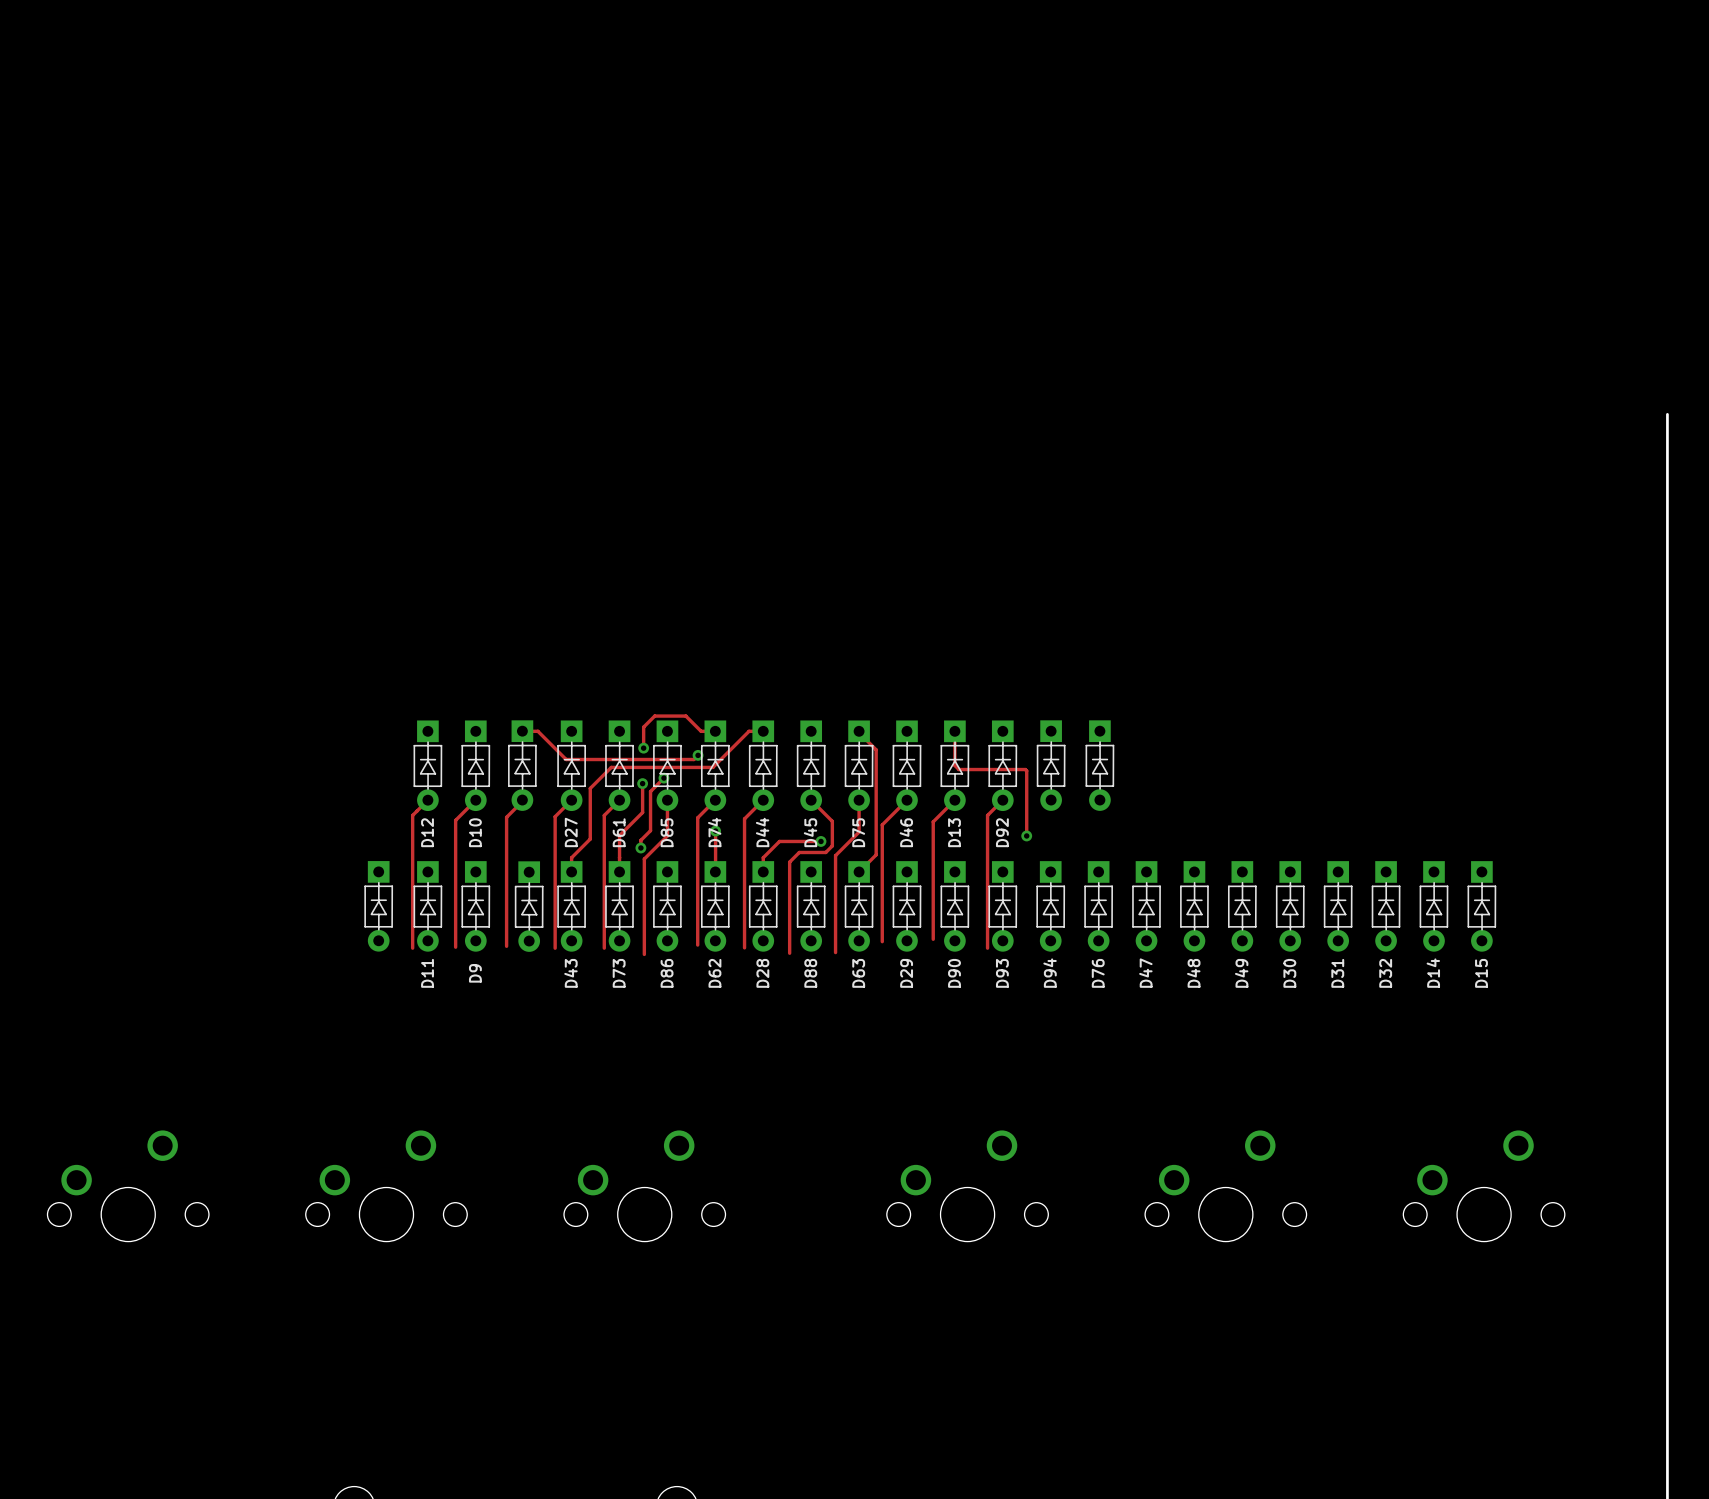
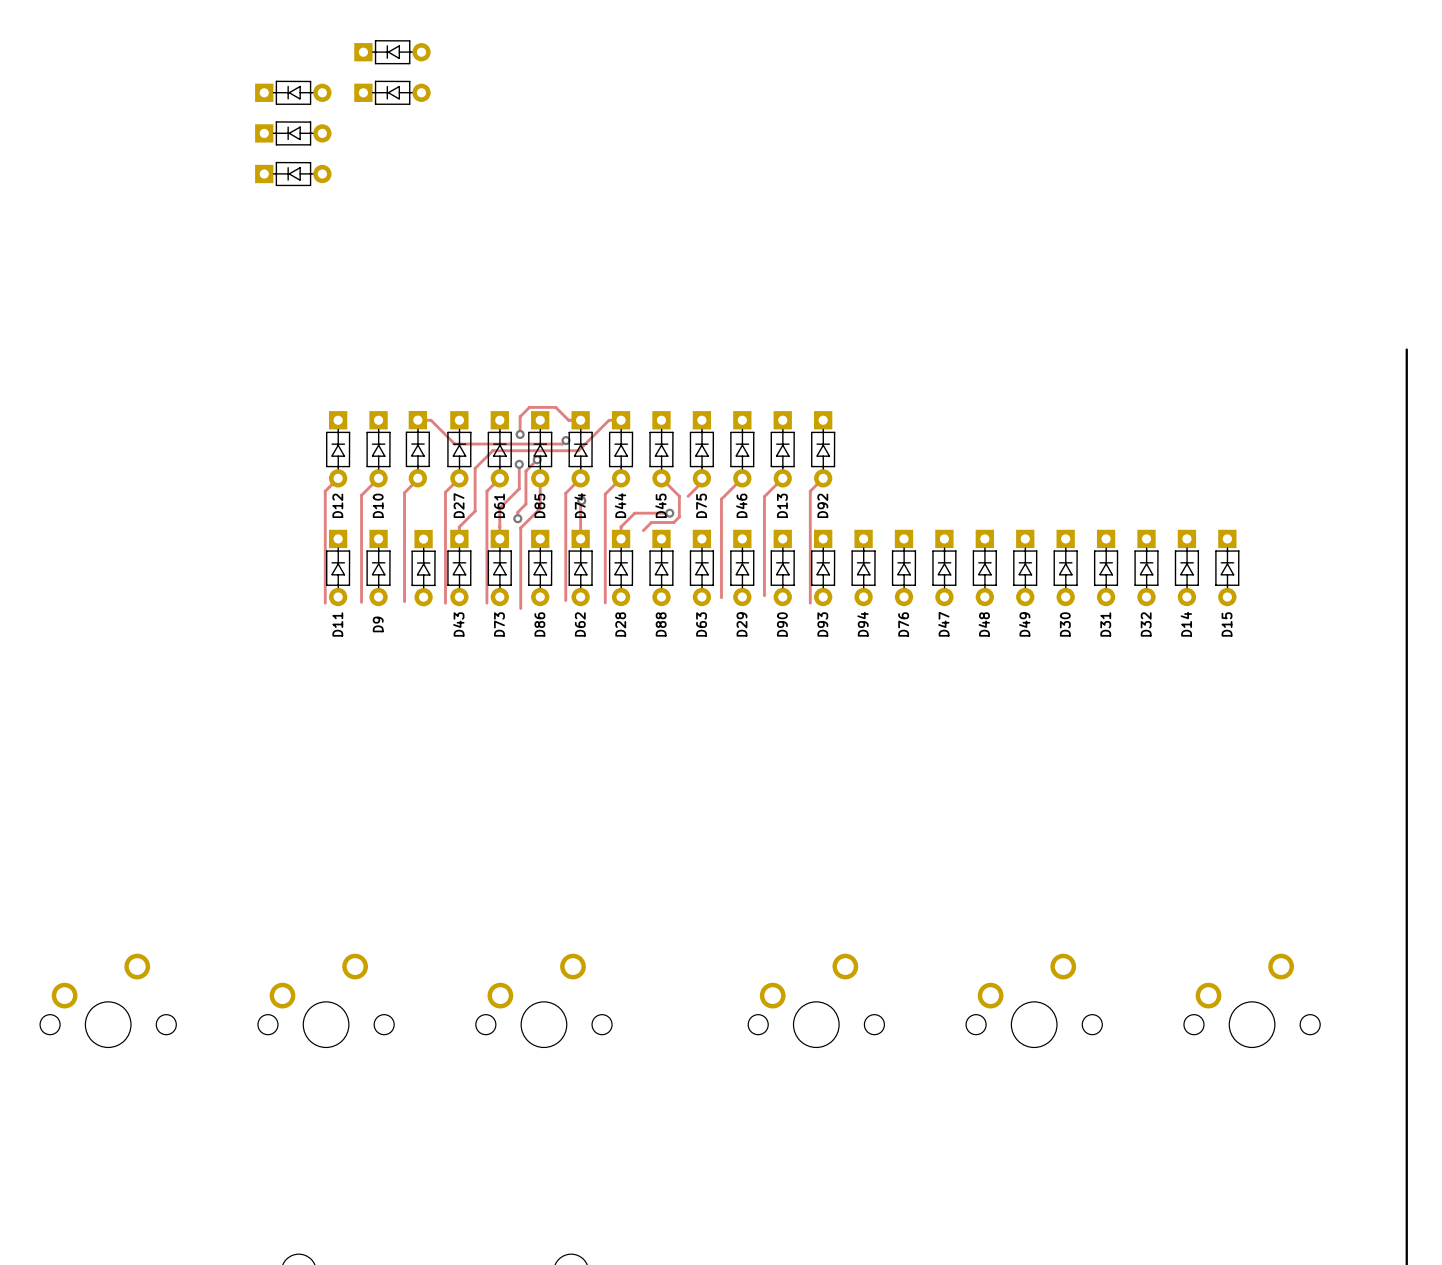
part: none -> (392, 52)
part: none -> (293, 92)
part: none -> (392, 92)
part: none -> (293, 133)
part: none -> (293, 174)
via: none -> (520, 434)
via: none -> (566, 440)
part: none -> (417, 449)
via: none -> (537, 459)
via: none -> (519, 464)
track: none -> (661, 478) (679, 496) (679, 516) (673, 522) (651, 522) (643, 530)
track: none -> (701, 478) (701, 482) (688, 496)
track: none -> (581, 500) (580, 538)
via: none -> (581, 500)
via: none -> (669, 513)
via: none -> (517, 518)
track: (523, 731) (537, 731) (566, 759) (693, 759) (698, 755) -> (418, 420) (430, 420) (454, 444) (562, 444) (566, 440)
track: (715, 731) (701, 731) (685, 716) (654, 716) (643, 727) (643, 748) -> (580, 420) (568, 420) (555, 407) (529, 407) (520, 416) (520, 434)
track: (763, 731) (749, 731) (712, 767) (611, 767) (590, 788) (590, 839) (571, 857) (571, 871) -> (621, 420) (609, 420) (578, 450) (492, 450) (475, 468) (475, 511) (459, 526) (459, 538)
track: (954, 731) (954, 765) (958, 769) (1026, 770) (1026, 835) -> none
track: (858, 732) (876, 749) (876, 854) (859, 871) -> none
via: (643, 748) -> none
via: (698, 755) -> none
D12 position: (427, 765) -> (338, 449)
D10 position: (475, 765) -> (378, 449)
part position: (522, 765) -> (423, 568)
D27 position: (571, 765) -> (459, 449)
D61 position: (619, 765) -> (499, 449)
D85 position: (667, 765) -> (540, 449)
D74 position: (715, 765) -> (580, 449)
D44 position: (763, 765) -> (621, 449)
D45 position: (811, 765) -> (661, 449)
D75 position: (859, 765) -> (701, 449)
D46 position: (906, 765) -> (742, 449)
D13 position: (954, 765) -> (782, 449)
D92 position: (1002, 765) -> (823, 449)
part: (1051, 765) -> none
part: (1099, 765) -> none
track: (663, 778) (650, 791) (650, 830) (640, 840) (640, 848) -> (537, 459) (525, 471) (525, 504) (517, 512) (517, 518)
via: (663, 778) -> none
track: (642, 783) (642, 812) (619, 835) (619, 871) -> (519, 464) (519, 488) (499, 508) (499, 538)
via: (642, 783) -> none
track: (427, 800) (412, 815) (412, 948) -> (338, 478) (325, 491) (325, 603)
track: (475, 800) (455, 820) (455, 947) -> (378, 478) (361, 495) (361, 602)
track: (523, 800) (506, 817) (506, 946) -> (418, 478) (404, 492) (404, 601)
track: (571, 800) (555, 816) (555, 948) -> (459, 478) (445, 492) (445, 603)
track: (619, 800) (604, 815) (604, 948) -> (499, 478) (486, 491) (486, 603)
track: (667, 800) (667, 835) (644, 859) (644, 954) -> (540, 478) (540, 508) (520, 528) (520, 608)
track: (715, 800) (697, 817) (697, 945) -> (580, 478) (565, 493) (565, 600)
track: (763, 800) (744, 818) (744, 947) -> (621, 478) (605, 494) (605, 602)
track: (811, 800) (832, 821) (832, 845) (825, 852) (799, 852) (789, 862) (789, 953) -> none
track: (859, 800) (859, 832) (835, 855) (835, 952) -> none
track: (906, 800) (882, 824) (882, 941) -> (742, 478) (721, 499) (721, 597)
track: (954, 800) (933, 821) (933, 939) -> (782, 478) (764, 496) (764, 595)
track: (1002, 800) (987, 815) (987, 948) -> (823, 478) (810, 491) (810, 603)
track: (715, 831) (715, 872) -> none
via: (715, 831) -> none
via: (1026, 835) -> none
track: (820, 841) (779, 841) (763, 857) (763, 871) -> (669, 513) (634, 513) (621, 526) (621, 538)
via: (820, 841) -> none
via: (640, 848) -> none
part: (378, 906) -> none
D11 position: (427, 906) -> (338, 567)
D9 position: (475, 906) -> (378, 567)
part: (529, 906) -> none
D43 position: (571, 906) -> (459, 567)
D73 position: (619, 906) -> (499, 567)
D86 position: (667, 906) -> (540, 567)
D62 position: (715, 906) -> (580, 567)
D28 position: (763, 906) -> (621, 567)
D88 position: (811, 906) -> (661, 567)
D63 position: (859, 906) -> (701, 567)
D29 position: (906, 906) -> (742, 567)
D90 position: (954, 906) -> (782, 567)
D93 position: (1002, 906) -> (823, 567)
D94 position: (1050, 906) -> (863, 567)
D76 position: (1098, 906) -> (904, 567)
D47 position: (1146, 906) -> (944, 567)
D48 position: (1194, 906) -> (984, 567)
D49 position: (1242, 906) -> (1025, 567)
D30 position: (1290, 906) -> (1065, 567)
D31 position: (1338, 906) -> (1106, 567)
D32 position: (1386, 906) -> (1146, 567)
D14 position: (1433, 906) -> (1186, 567)
D15 position: (1481, 906) -> (1227, 567)

